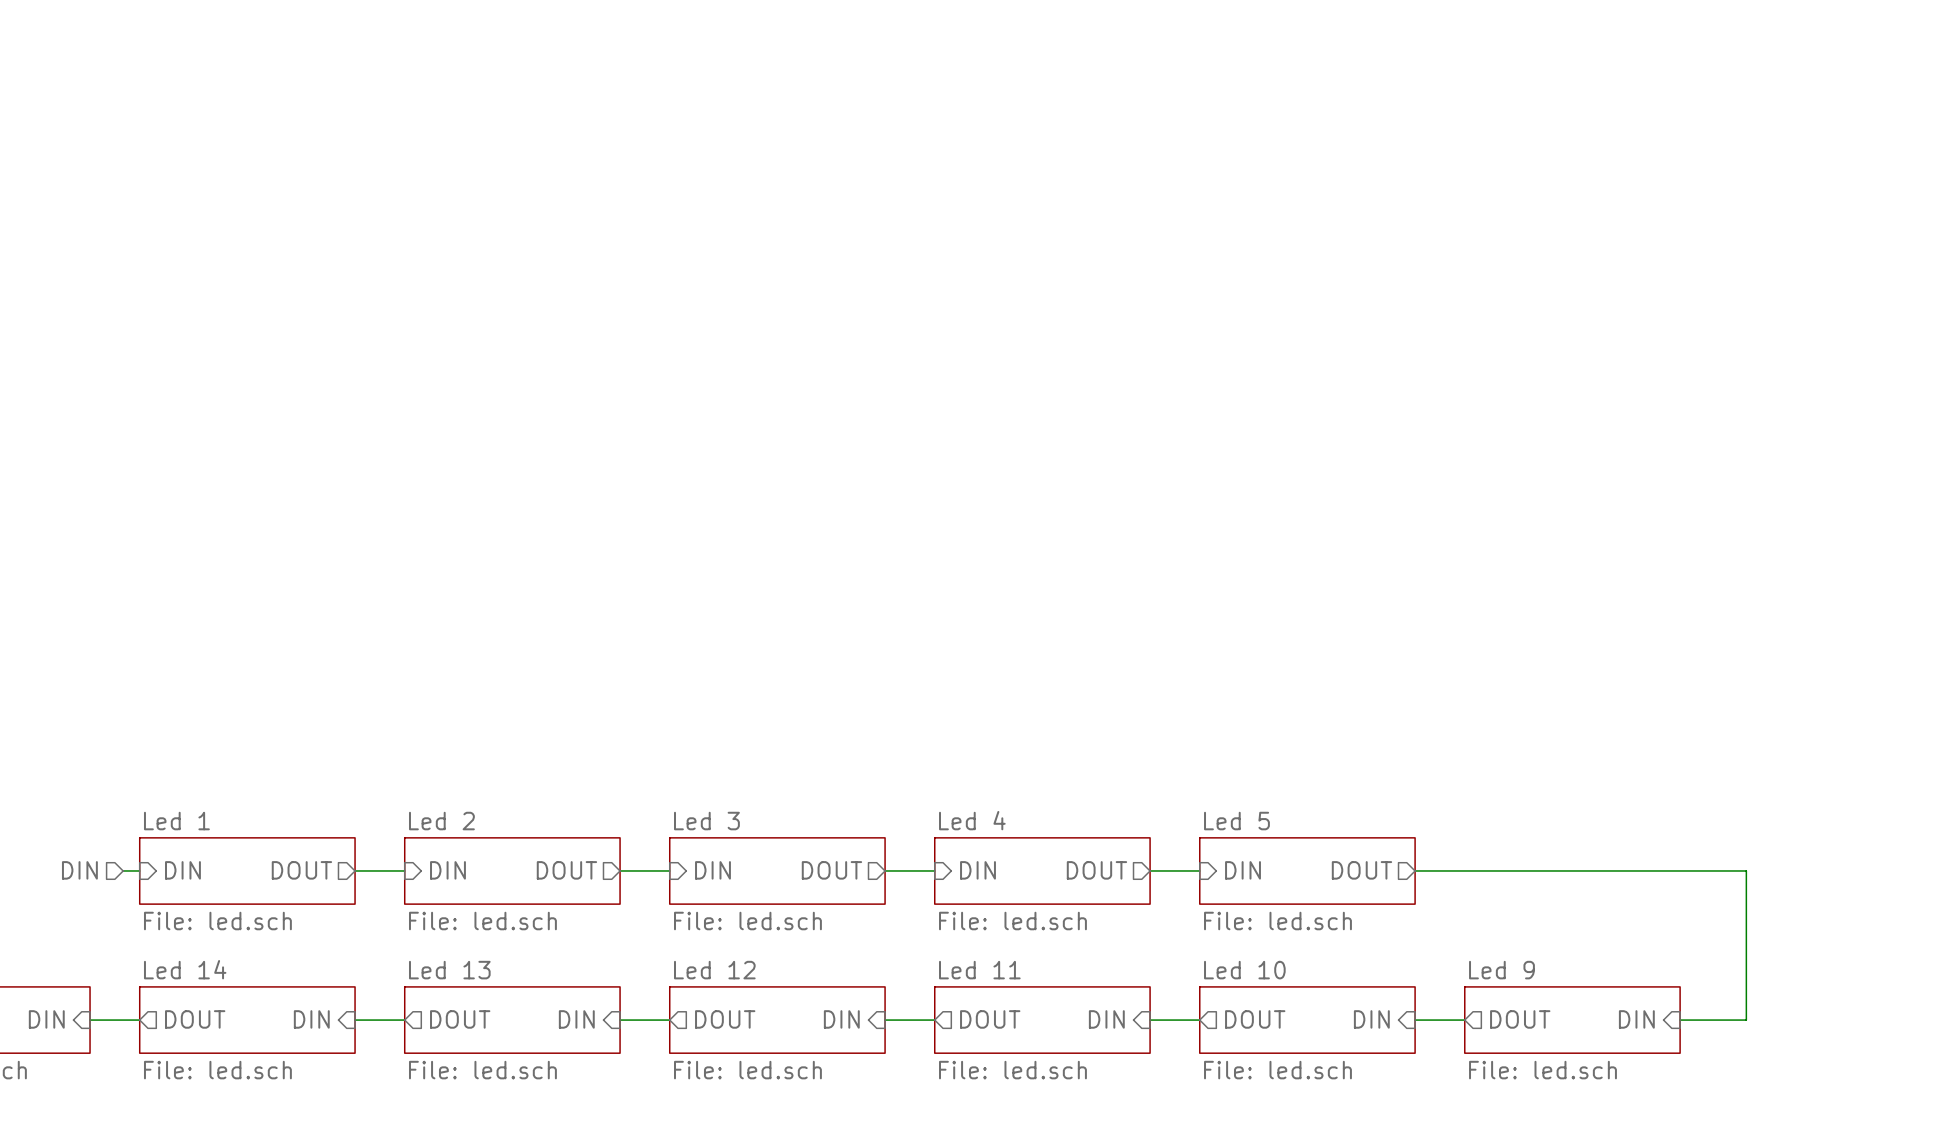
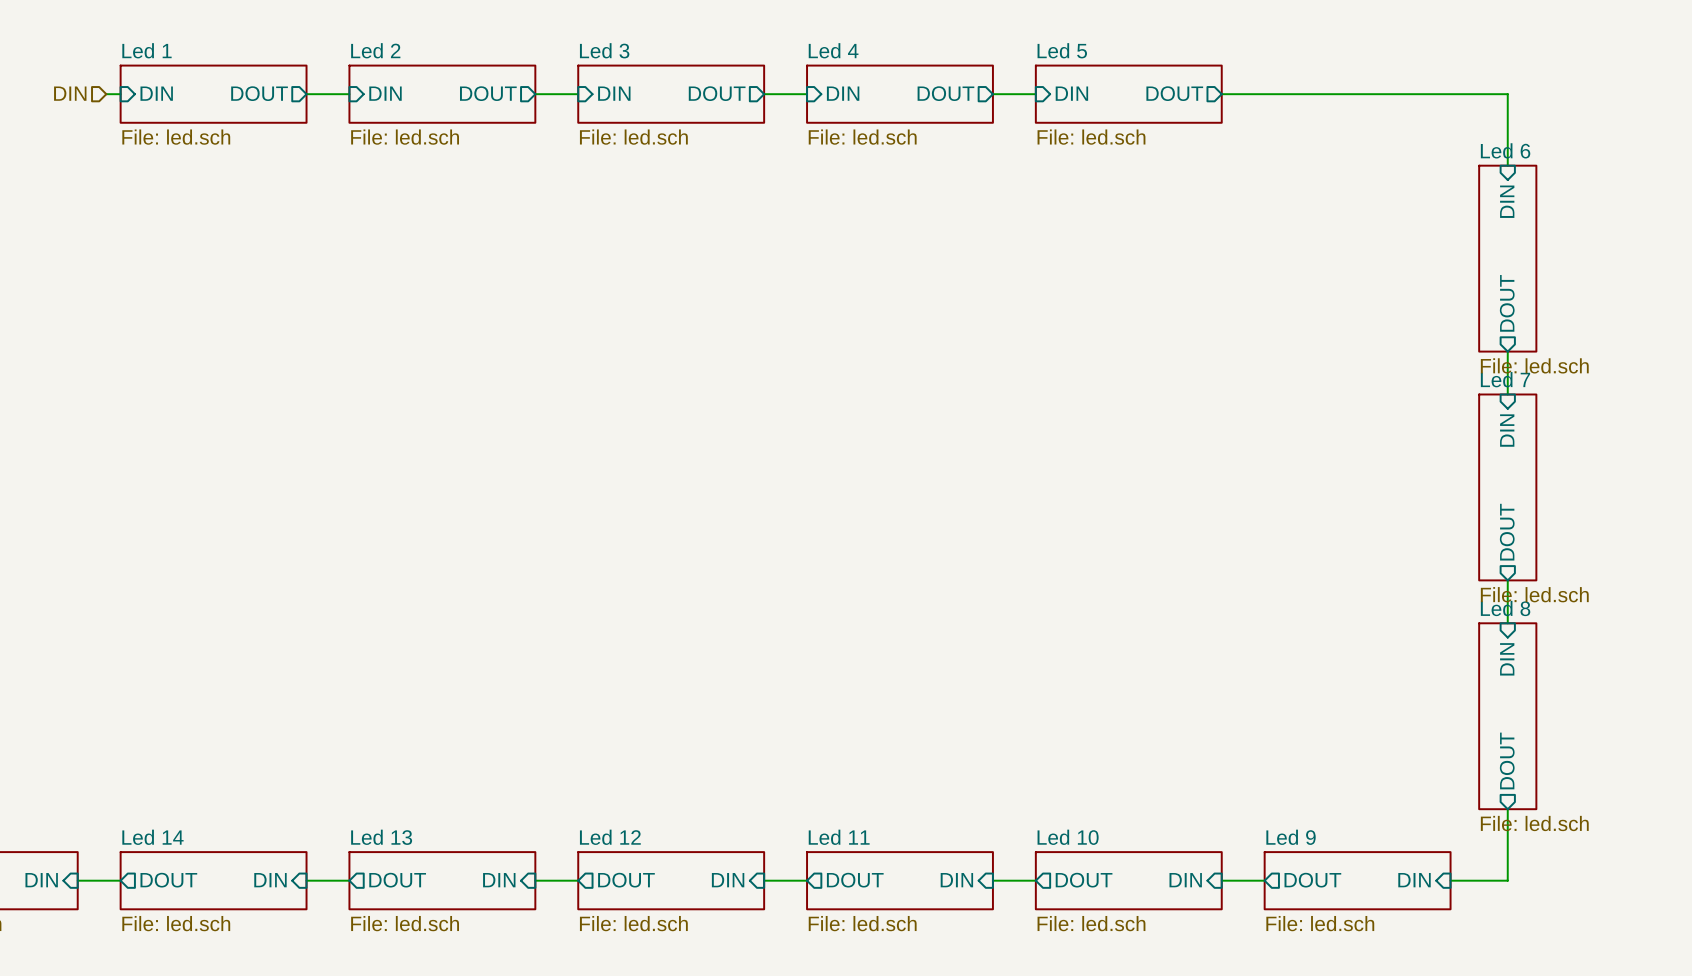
hierarchical label: none -> DIN (70, 93)
sheet pin: none -> DIN (156, 93)
sheet pin: none -> DOUT (259, 93)
sheet pin: none -> DIN (385, 93)
sheet pin: none -> DOUT (488, 93)
sheet pin: none -> DIN (614, 93)
sheet pin: none -> DOUT (717, 93)
sheet pin: none -> DIN (843, 93)
sheet pin: none -> DOUT (945, 93)
sheet pin: none -> DIN (1071, 93)
sheet pin: none -> DOUT (1174, 93)
wire: none -> (106, 94) (120, 94)
wire: none -> (306, 94) (349, 94)
wire: none -> (535, 94) (578, 94)
wire: none -> (764, 94) (807, 94)
wire: none -> (992, 94) (1035, 94)
wire: none -> (1221, 94) (1507, 94) (1507, 165)
sheet pin: none -> DIN (1507, 201)
sheet Led 6: none -> File: led.sch (1507, 258)
sheet pin: none -> DOUT (1507, 303)
wire: none -> (1507, 351) (1507, 394)
sheet pin: none -> DIN (1507, 430)
sheet Led 7: none -> File: led.sch (1507, 487)
sheet pin: none -> DOUT (1507, 532)
wire: none -> (1507, 580) (1507, 623)
sheet pin: none -> DIN (1507, 659)
sheet Led 8: none -> File: led.sch (1507, 716)
hierarchical label: DIN (79, 870) -> none
wire: (123, 870) (139, 870) -> none
sheet pin: DIN (182, 870) -> none
sheet Led 1 position: (247, 870) -> (213, 94)
sheet pin: DOUT (301, 870) -> none
wire: (355, 870) (404, 870) -> none
sheet pin: DIN (447, 870) -> none
sheet Led 2 position: (512, 870) -> (442, 94)
sheet pin: DOUT (566, 870) -> none
wire: (620, 870) (669, 870) -> none
sheet pin: DIN (712, 870) -> none
sheet Led 3 position: (777, 870) -> (671, 94)
sheet pin: DOUT (831, 870) -> none
wire: (885, 870) (934, 870) -> none
sheet pin: DIN (977, 870) -> none
sheet Led 4 position: (1042, 870) -> (899, 94)
sheet pin: DOUT (1096, 870) -> none
wire: (1150, 870) (1199, 870) -> none
sheet pin: DIN (1243, 870) -> none
sheet Led 5 position: (1307, 870) -> (1128, 94)
sheet pin: DOUT (1361, 870) -> none
wire: (1415, 870) (1746, 870) (1746, 937) -> none
sheet pin: none -> DOUT (1507, 760)

